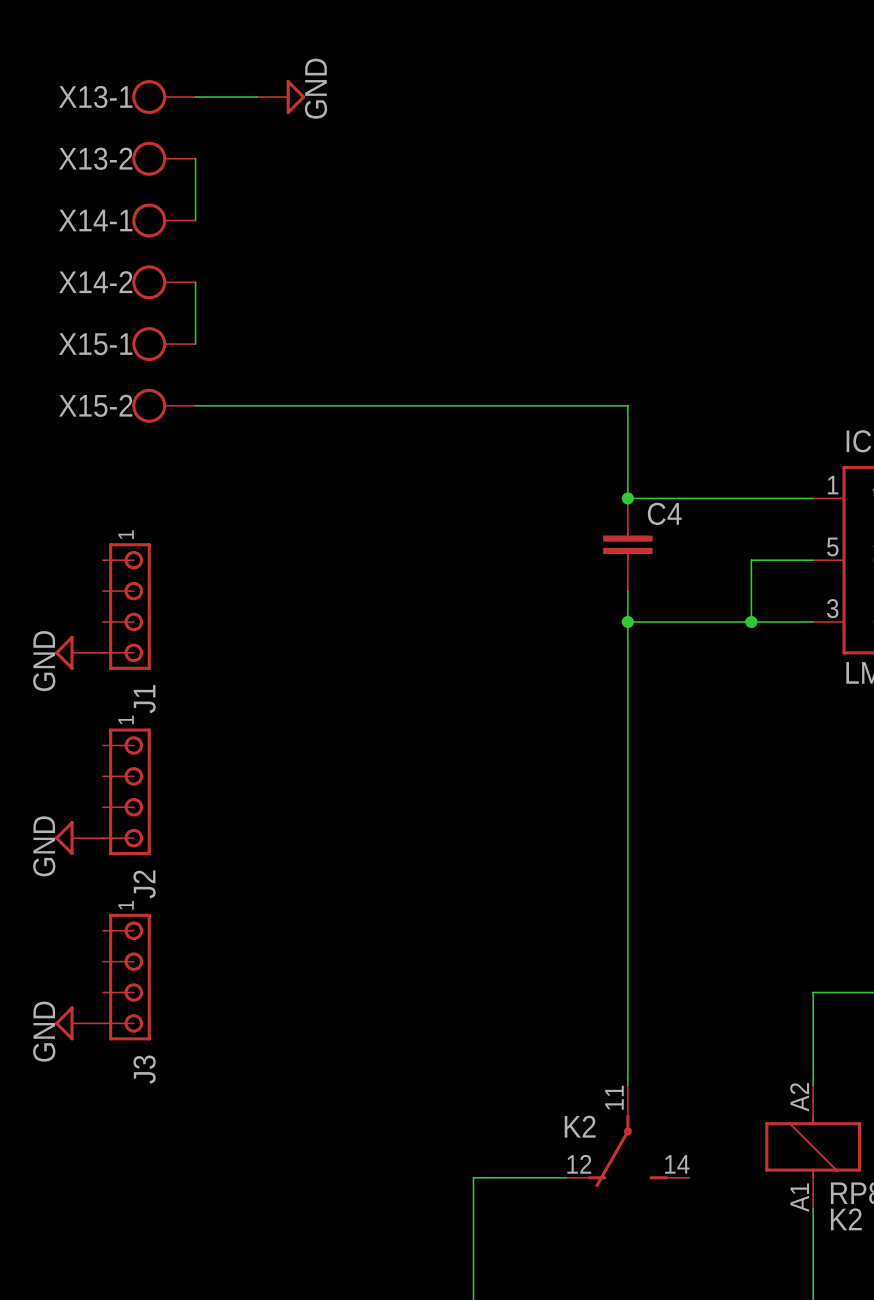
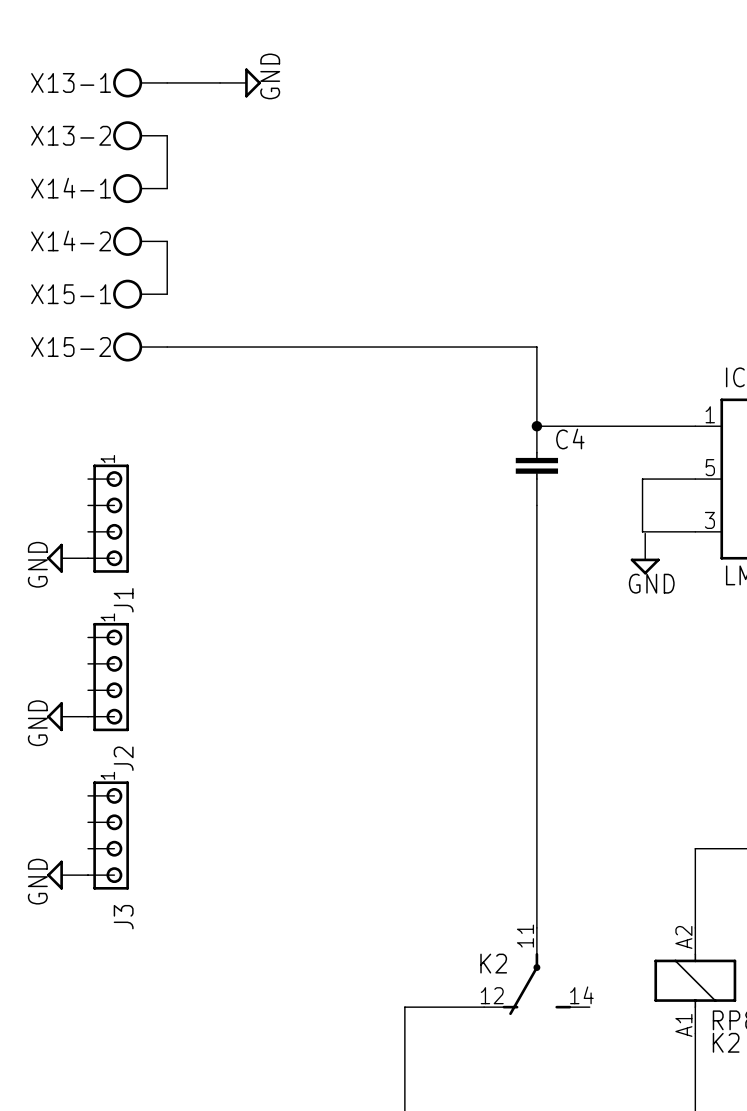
wire: (627, 621) (751, 621) -> none
junction: (627, 621) -> none
junction: (751, 621) -> none
power symbol: none -> GND (645, 553)

